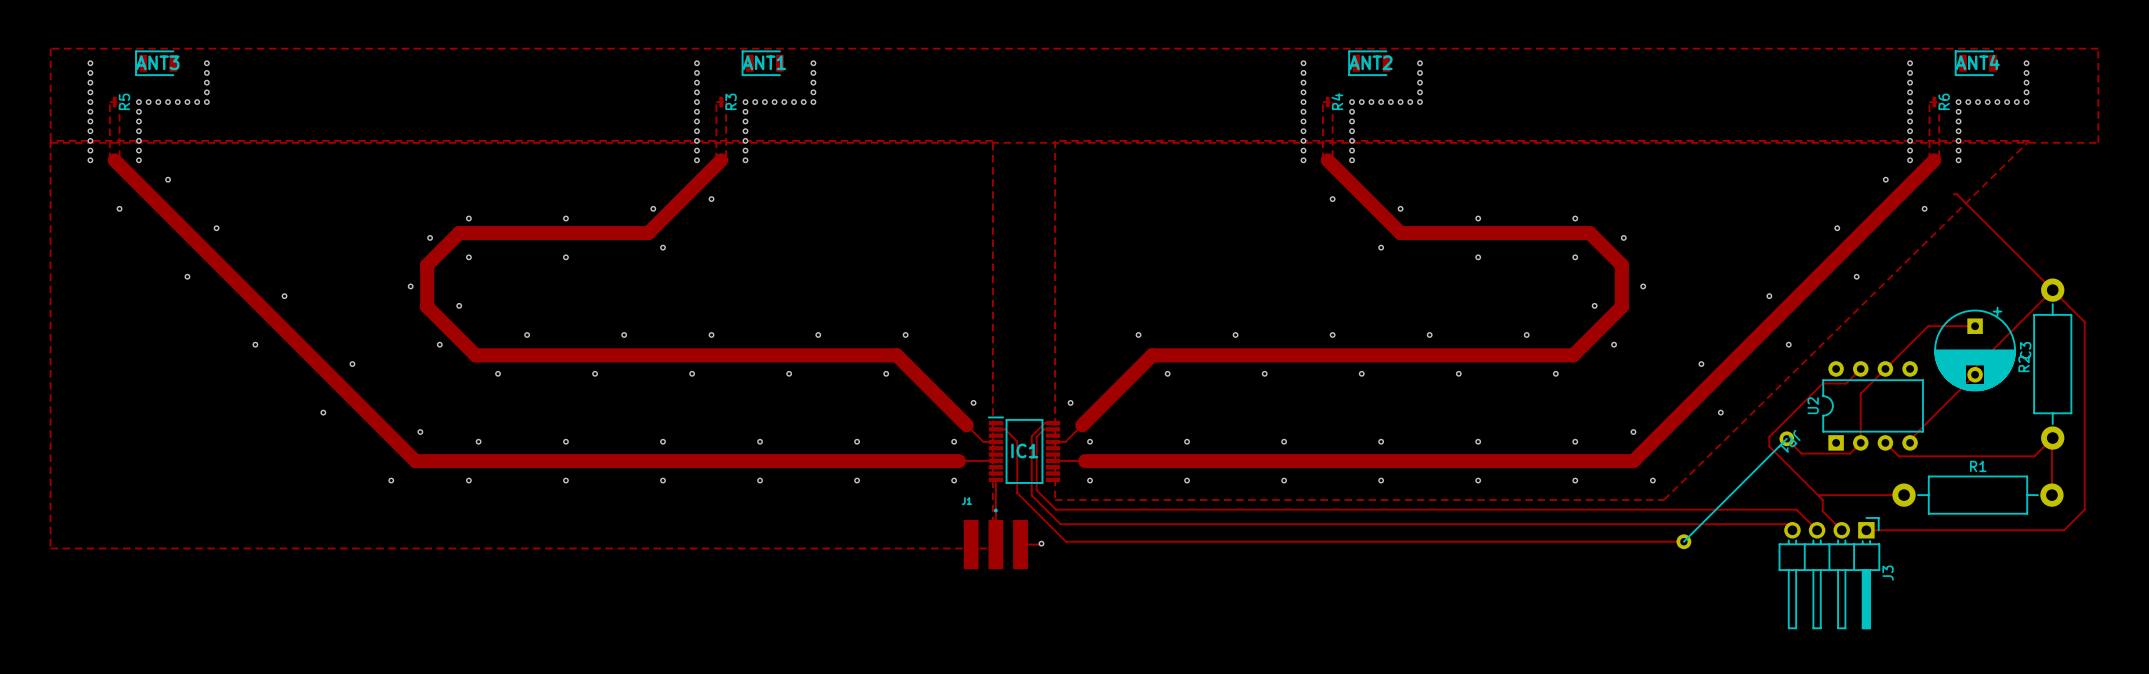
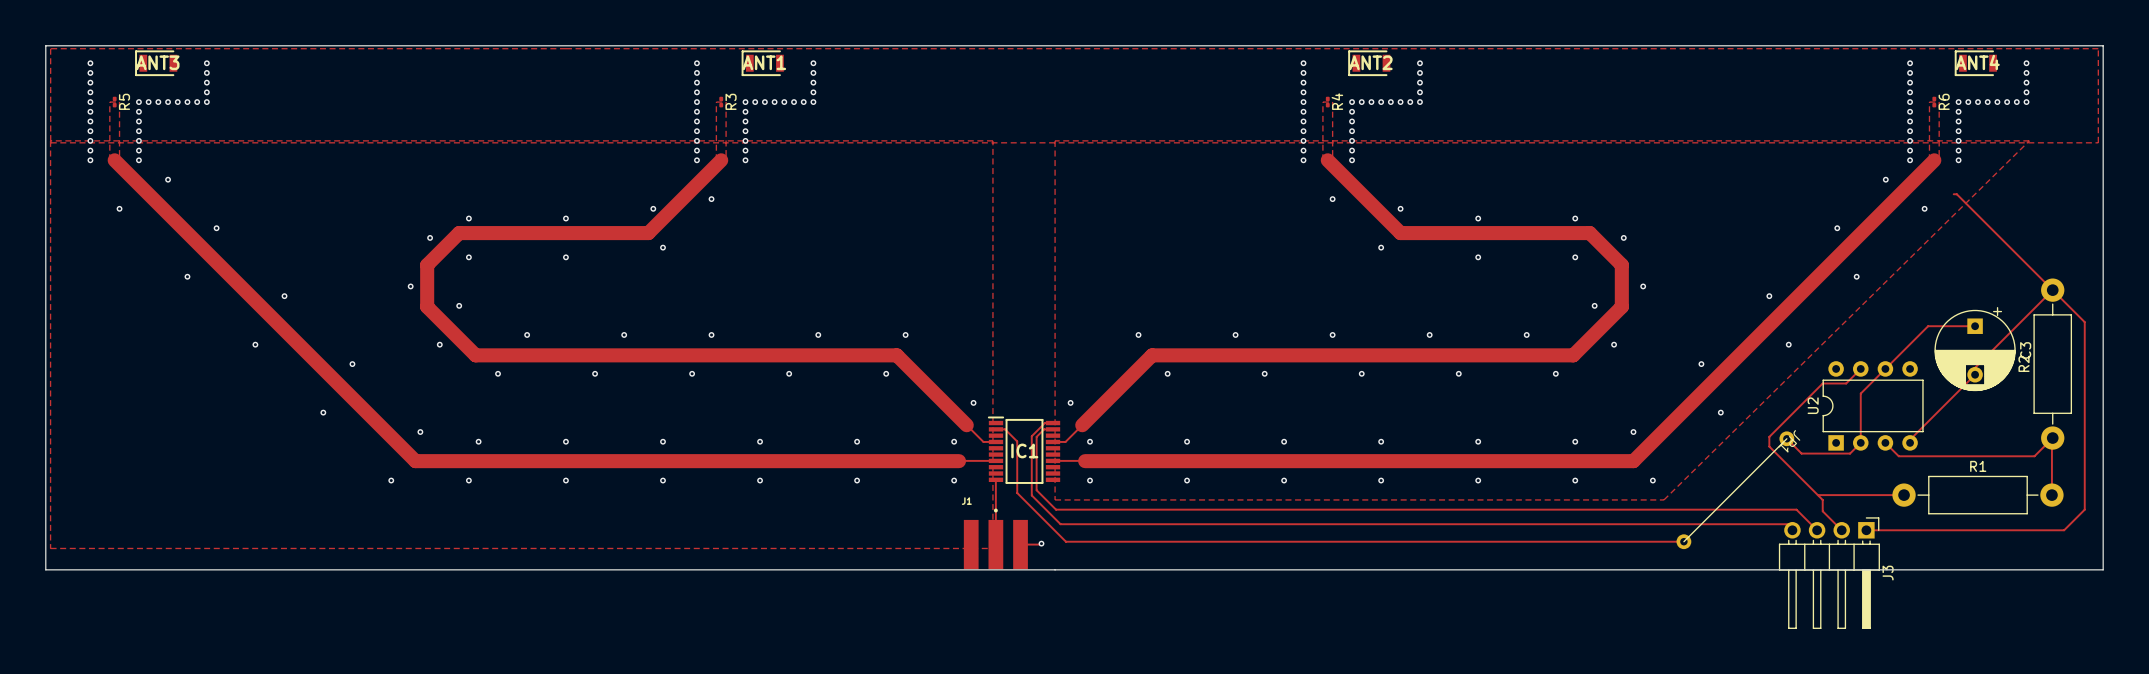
board edge: none -> (45, 45) (2103, 45) (2103, 569) (45, 569) (45, 45)

